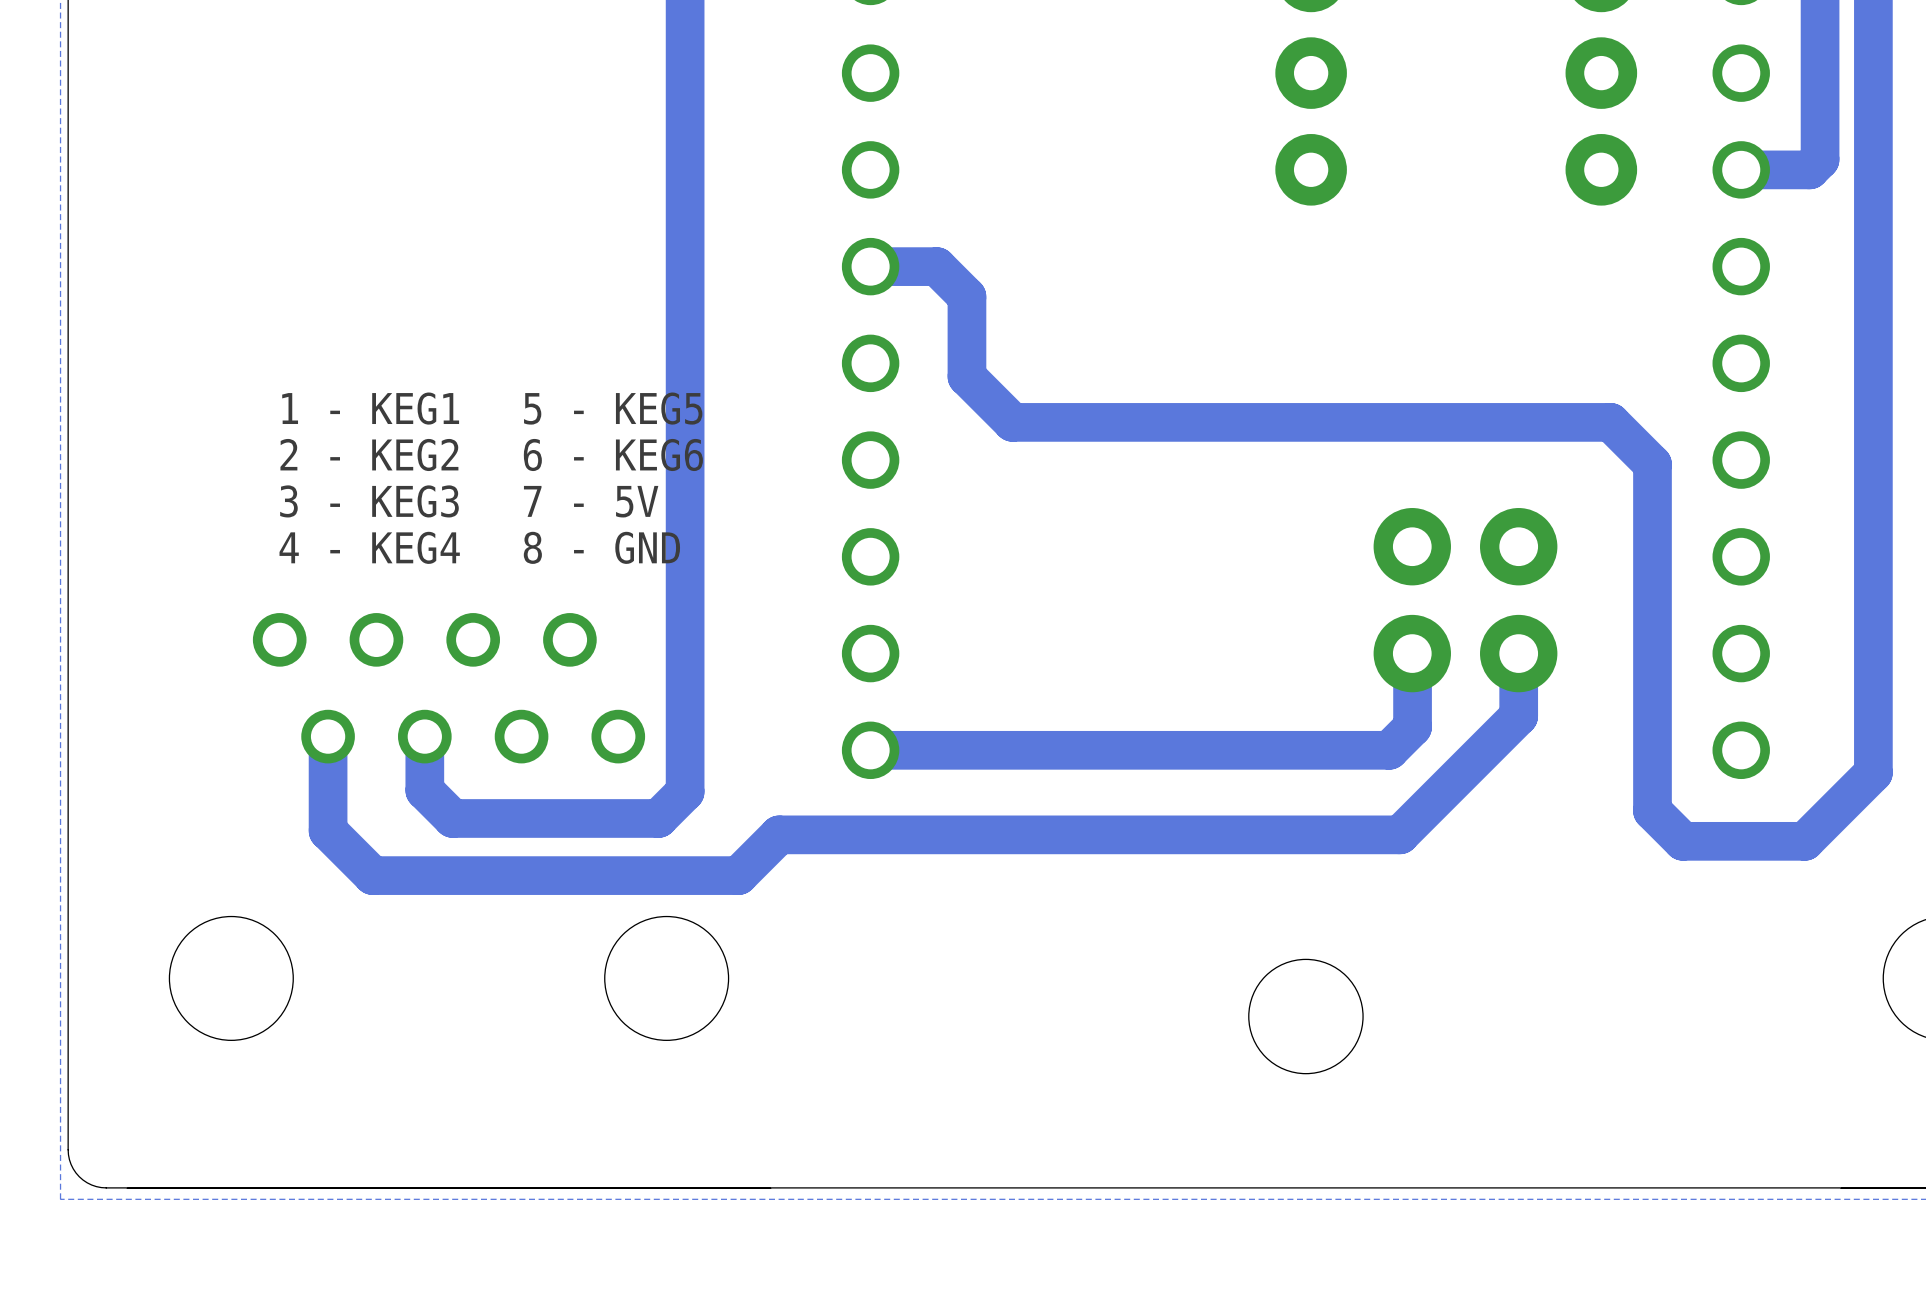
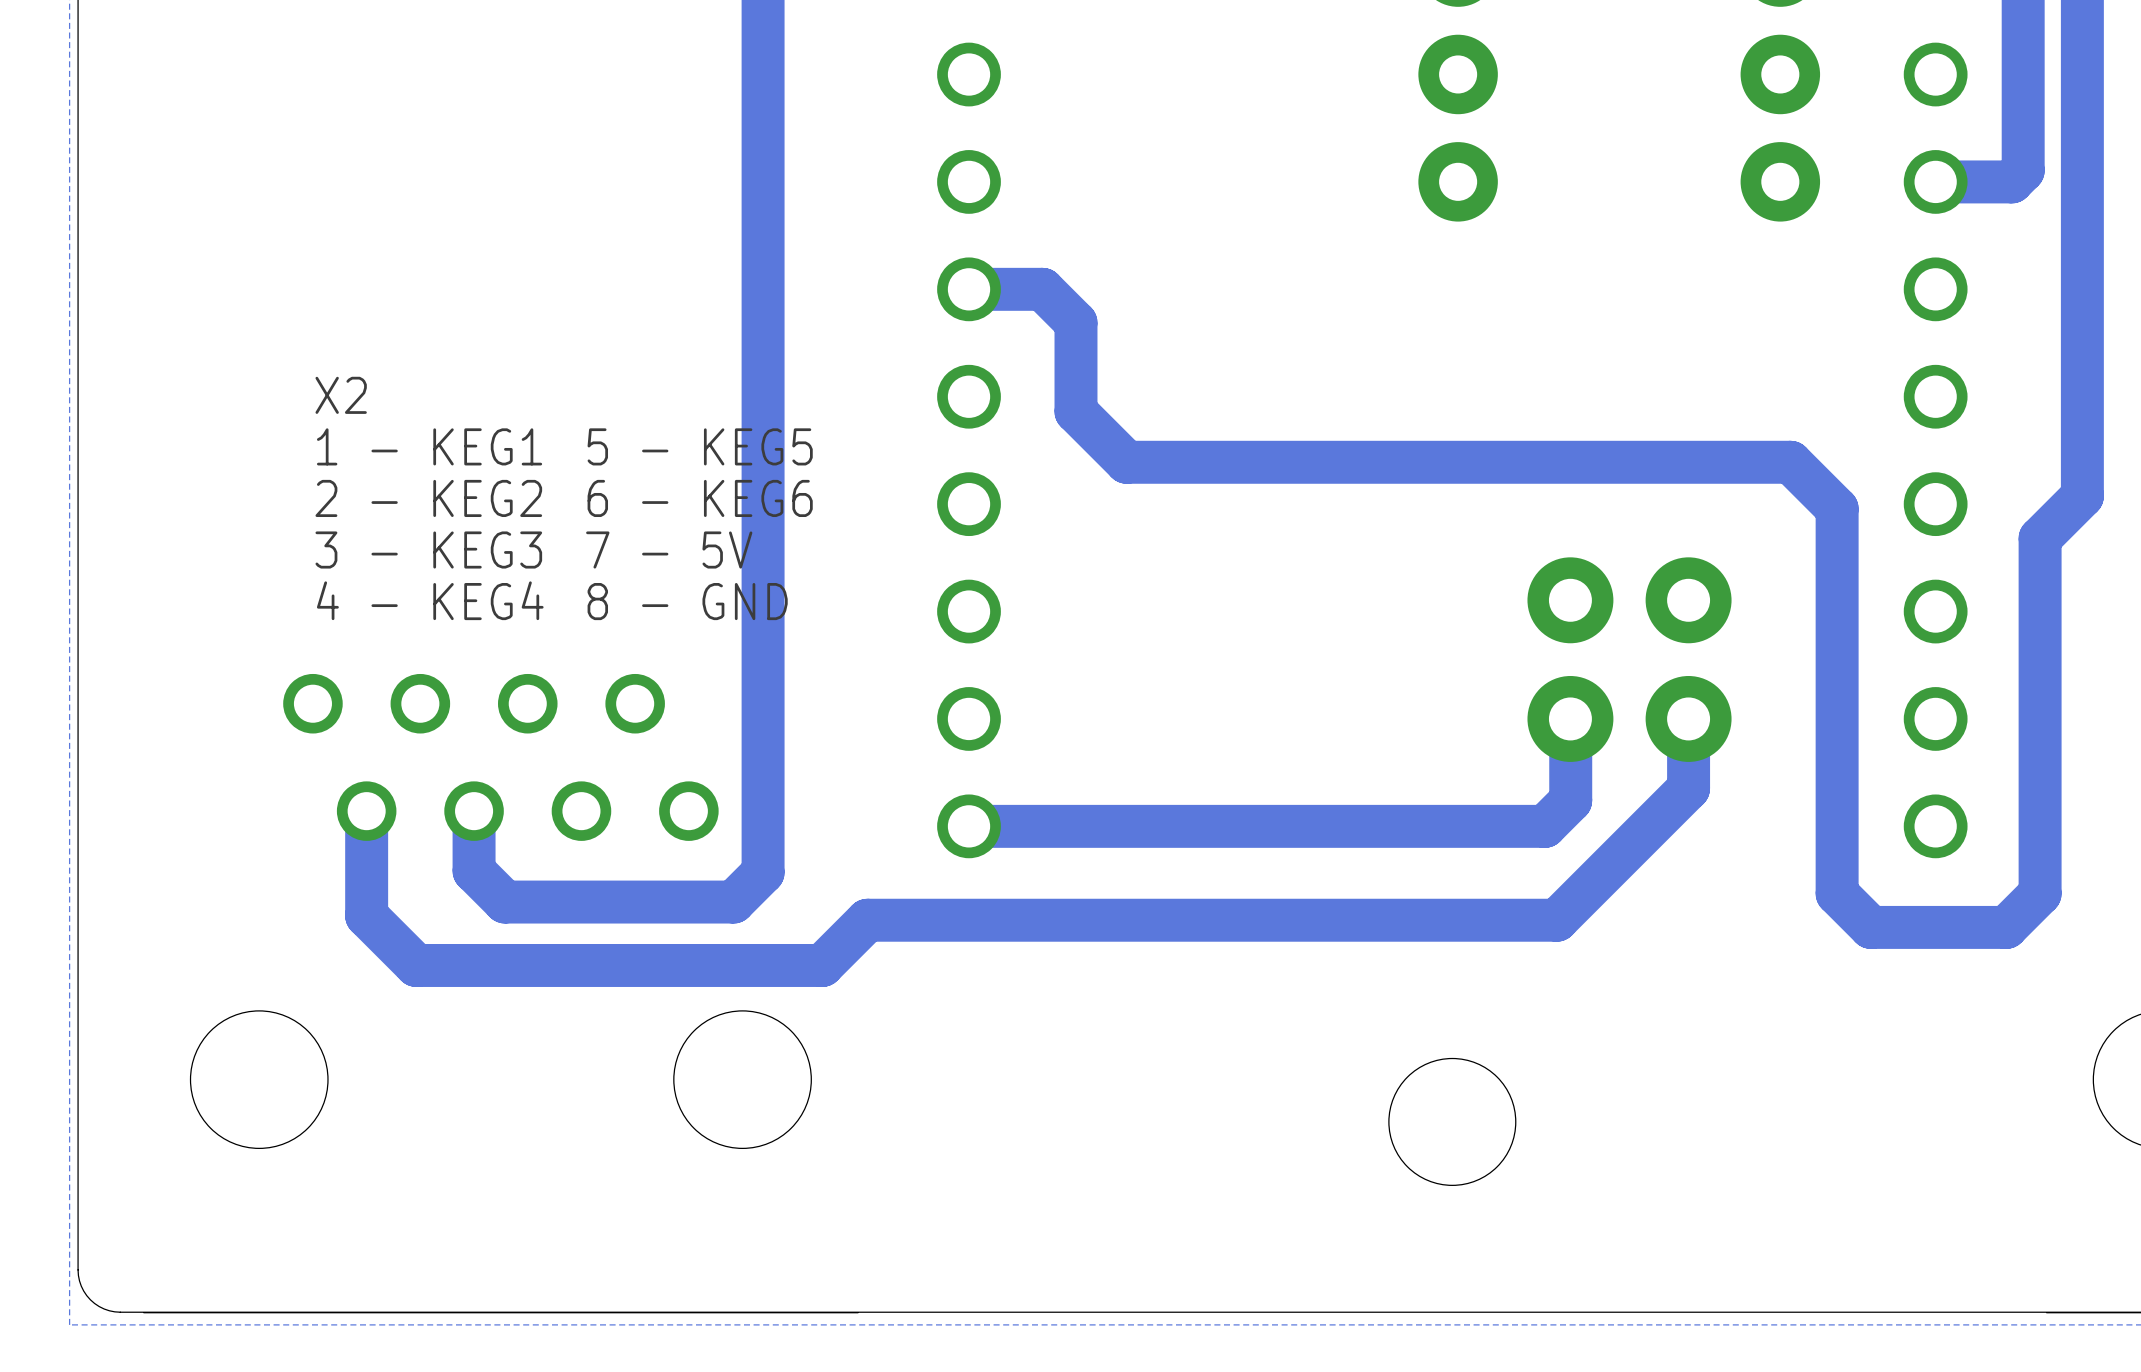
text: none -> X2 (341, 395)
track: (1873, 452) (1873, 772) (1835, 810) -> (2082, 496) (2040, 538) (2040, 893)

